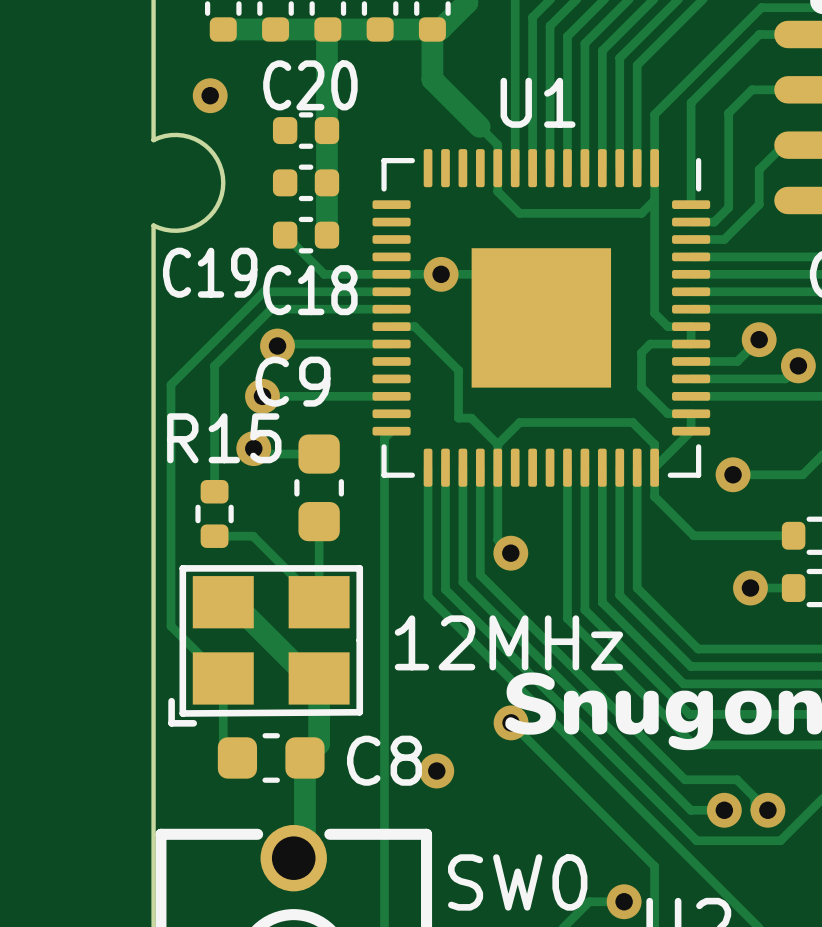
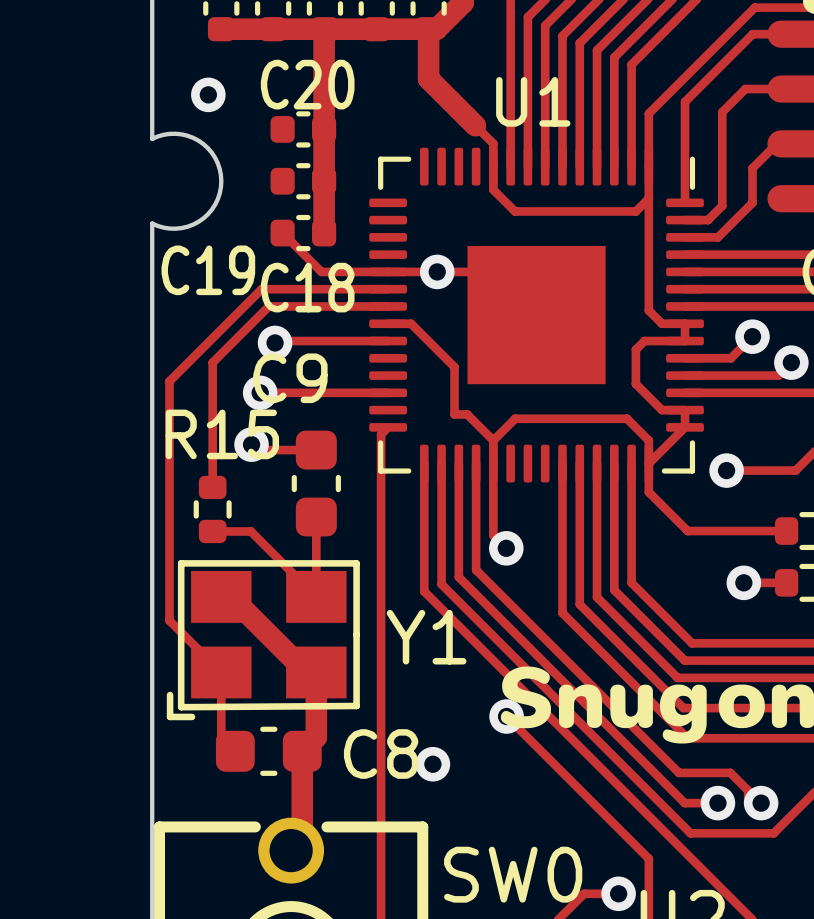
part value: 12MHz (508, 642) -> Y1 (426, 637)

